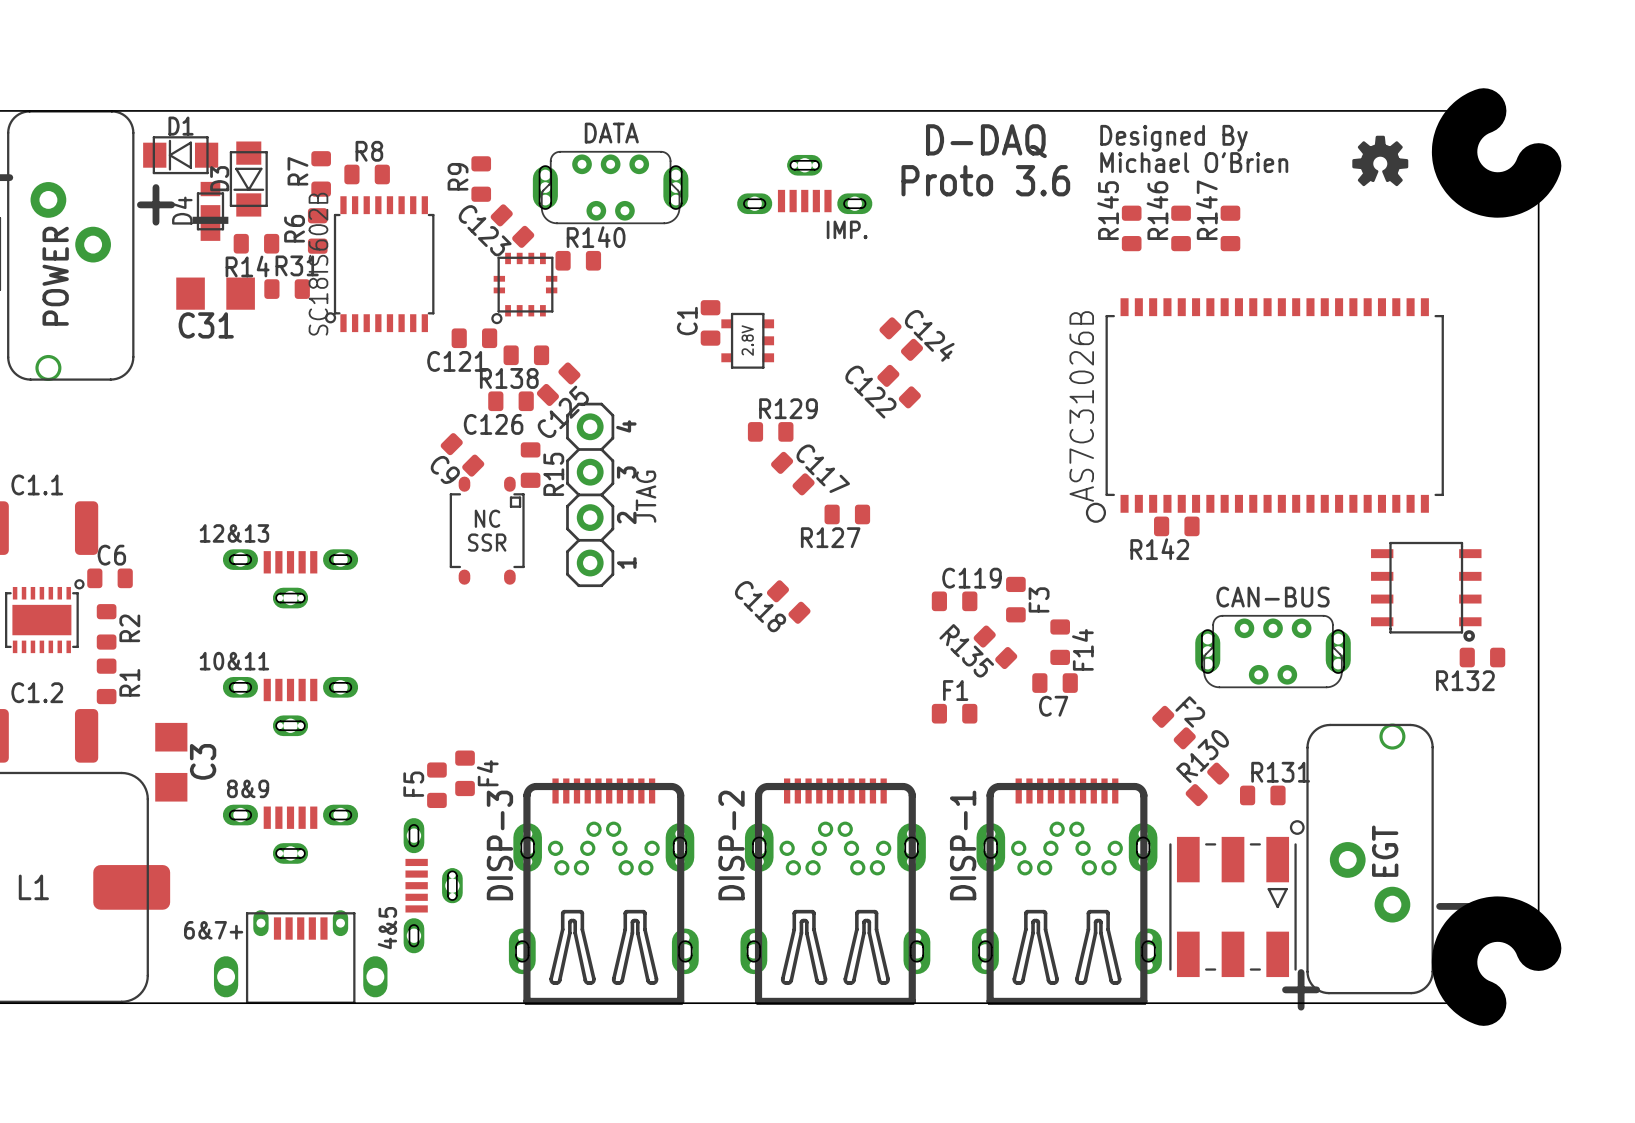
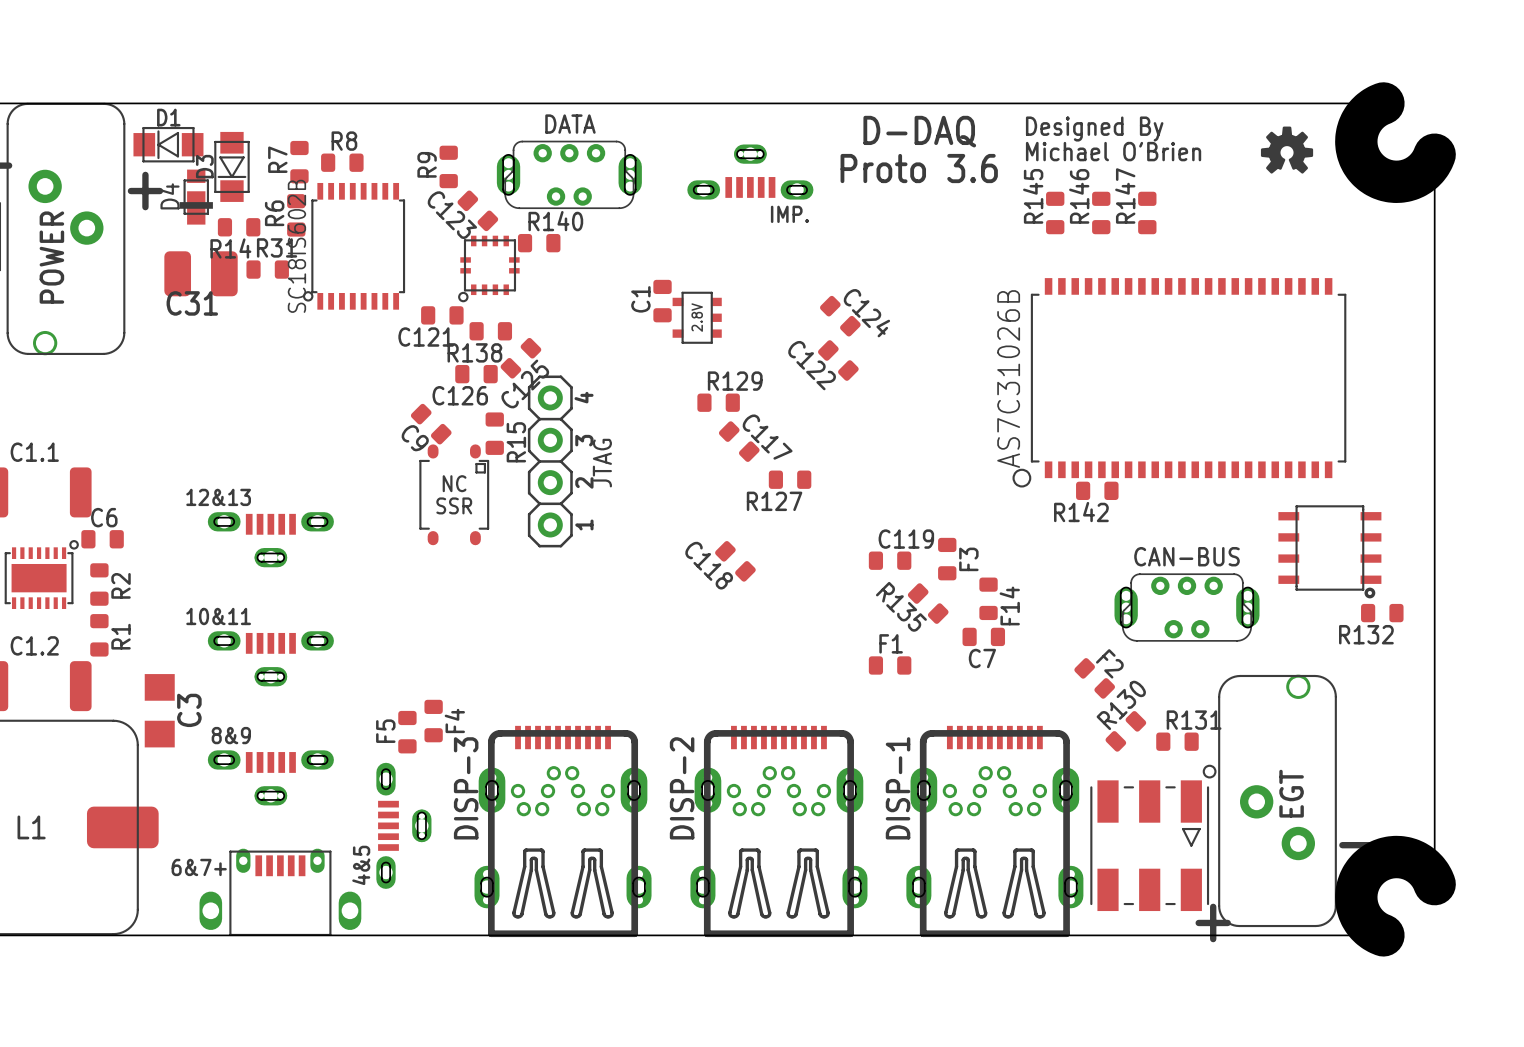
C31 footprint: [176, 277, 255, 310] -> [164, 251, 238, 297]

